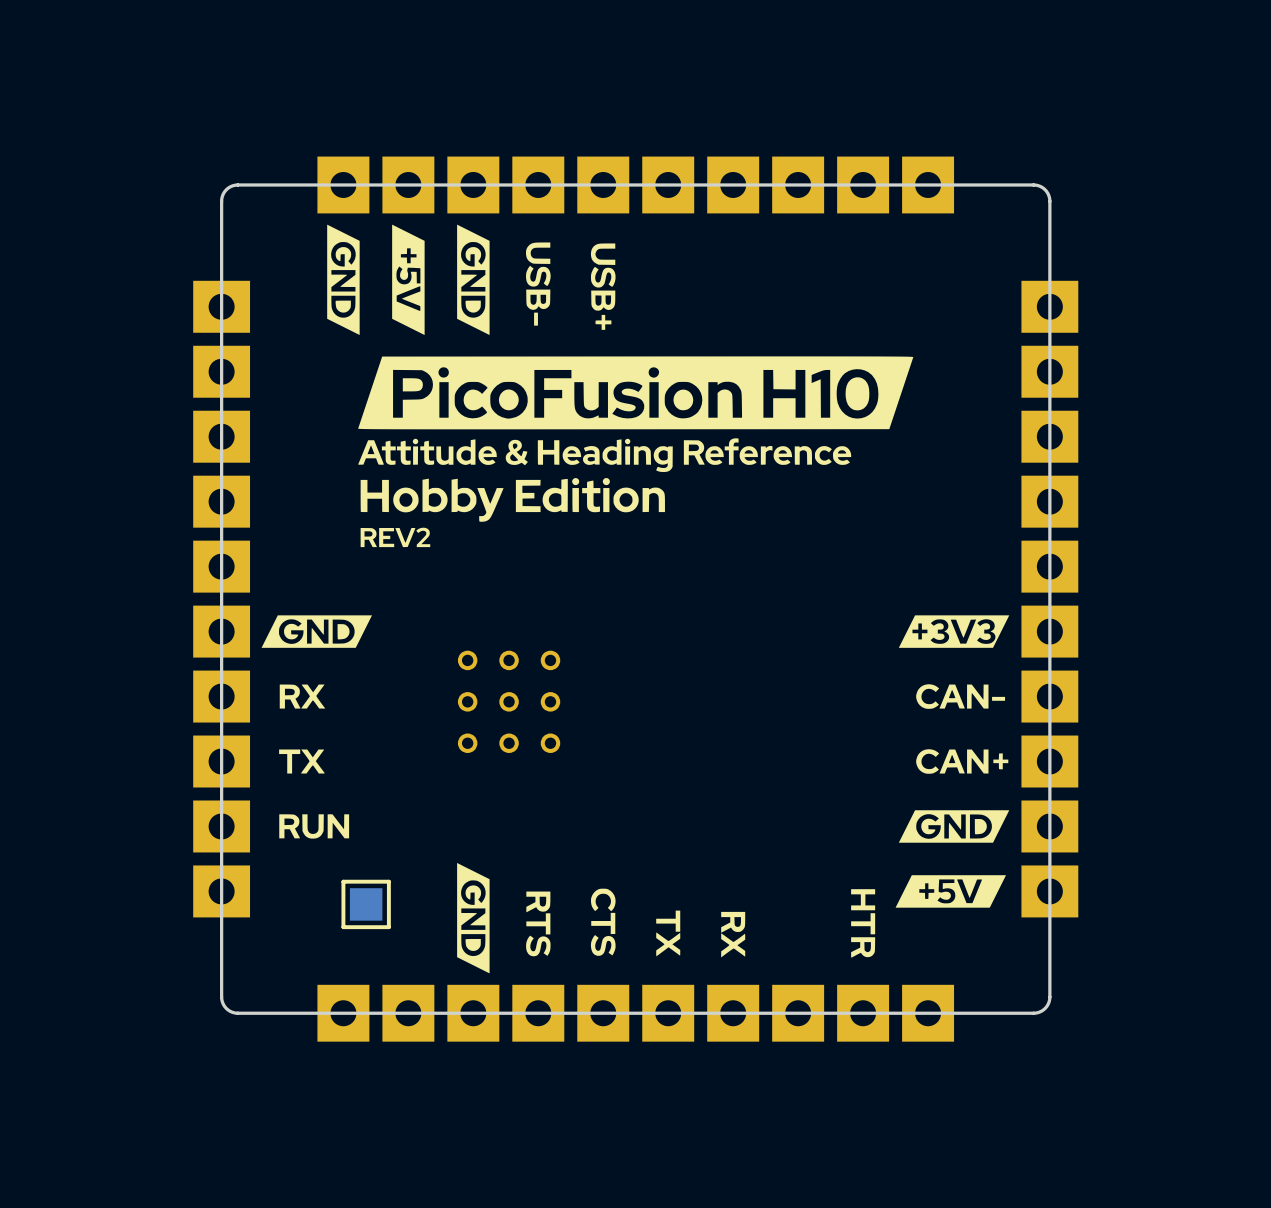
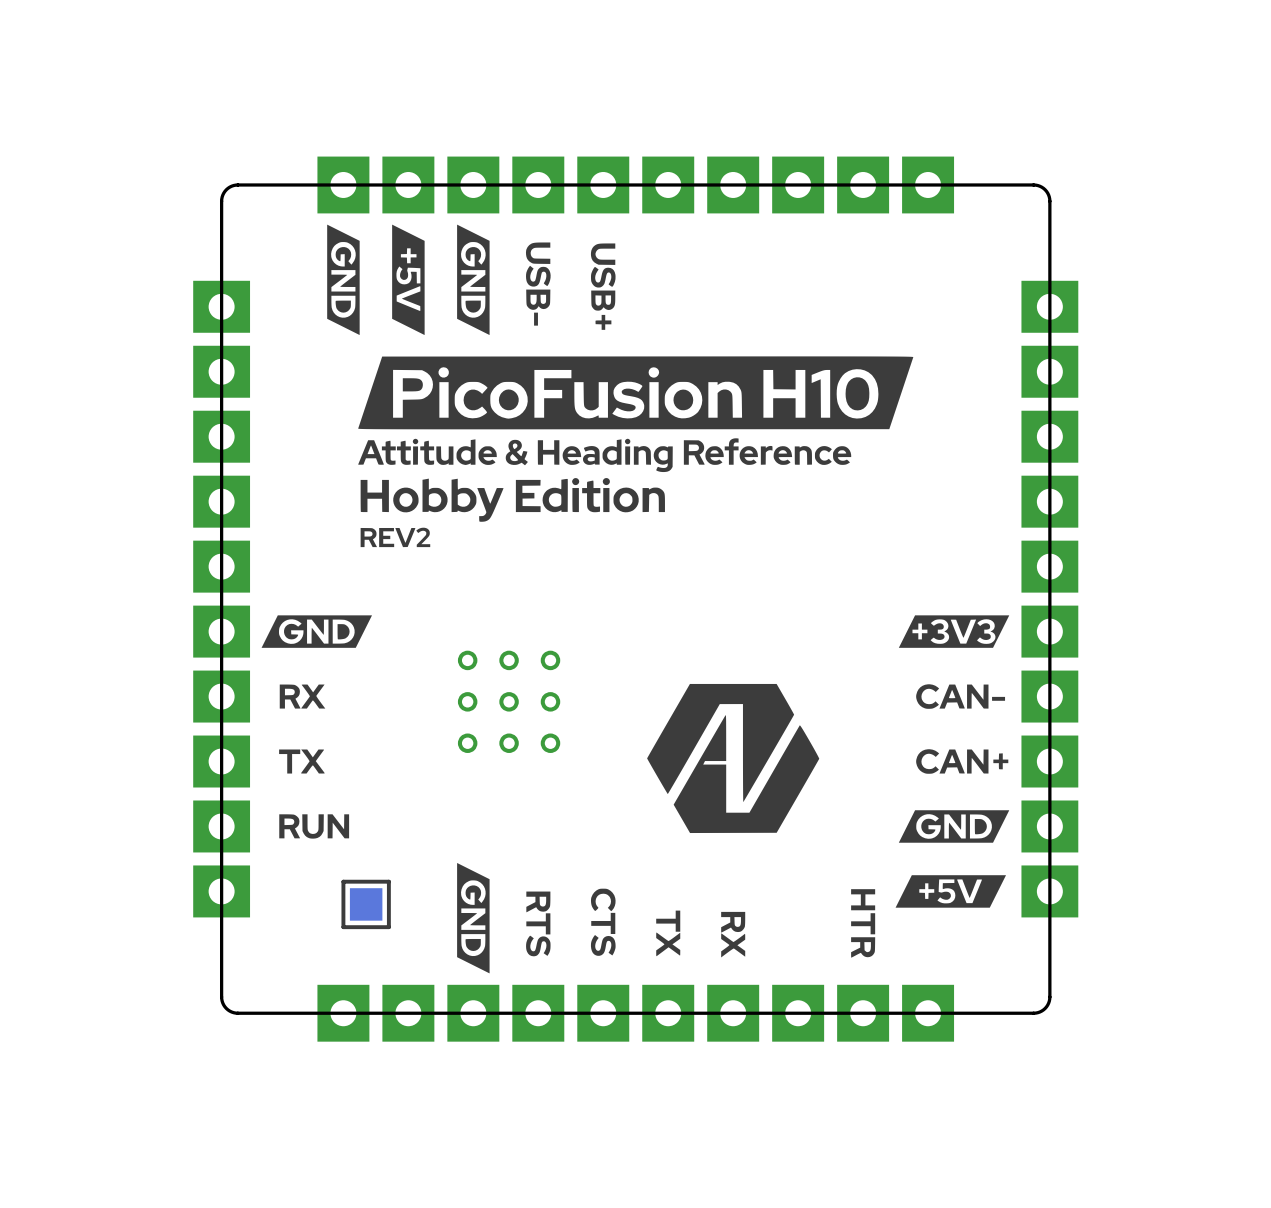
drawing: none -> [647, 683, 820, 834]

